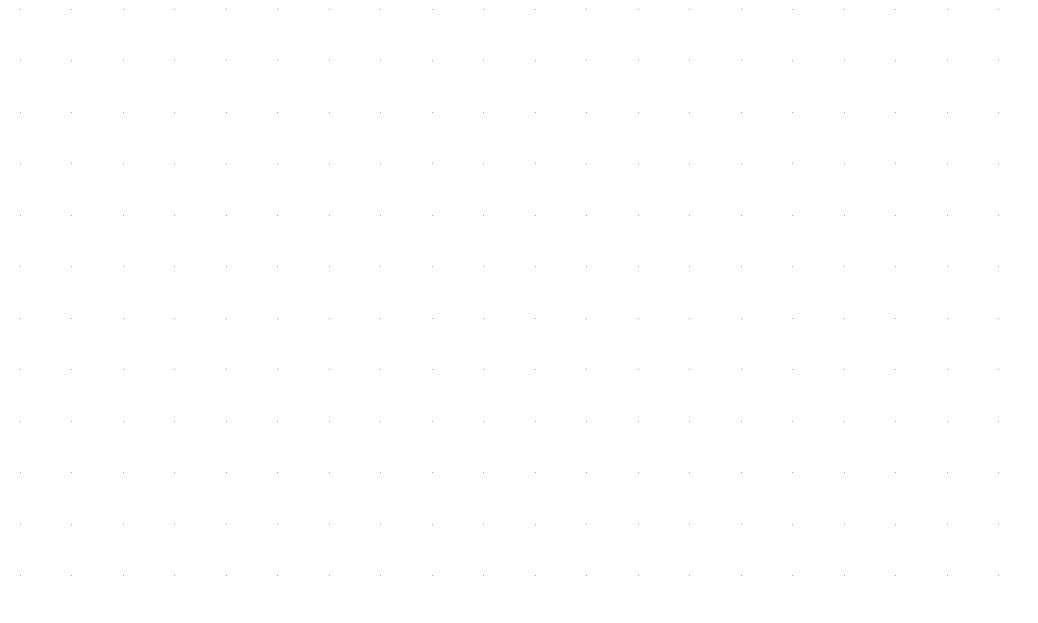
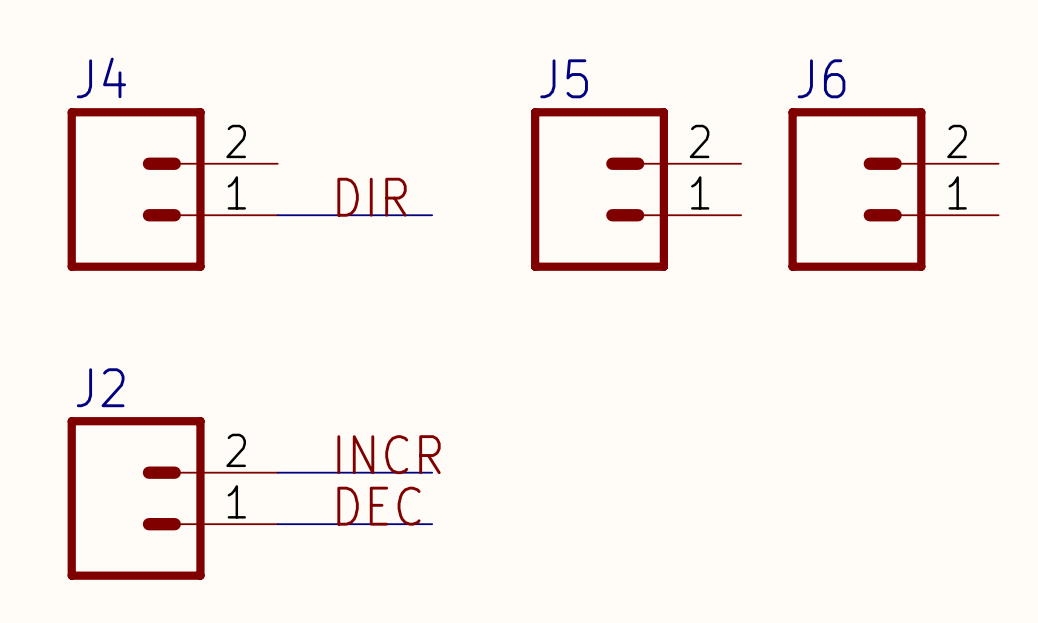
J4: none -> (172, 189)
J5: none -> (636, 189)
J6: none -> (893, 189)
label: none -> DIR (372, 197)
wire: none -> (277, 215) (432, 215)
label: none -> INCR (389, 454)
wire: none -> (277, 472) (432, 472)
J2: none -> (172, 498)
label: none -> DEC (378, 506)
wire: none -> (277, 524) (432, 524)

